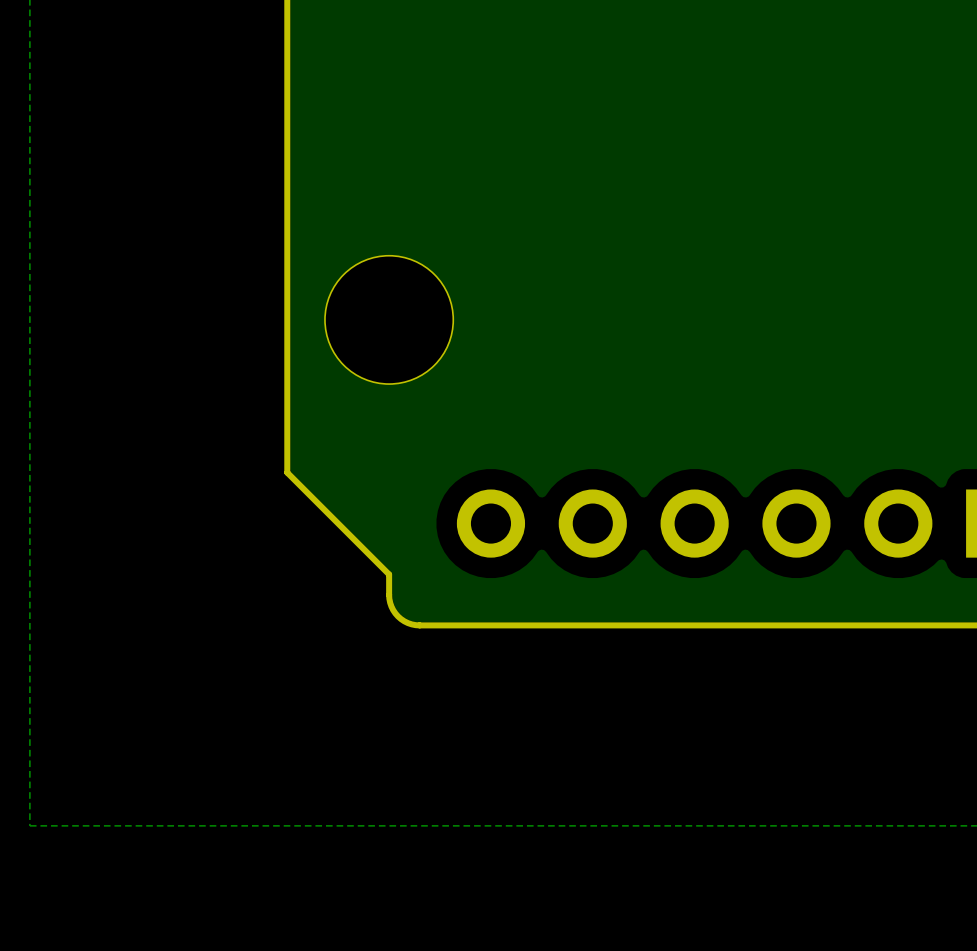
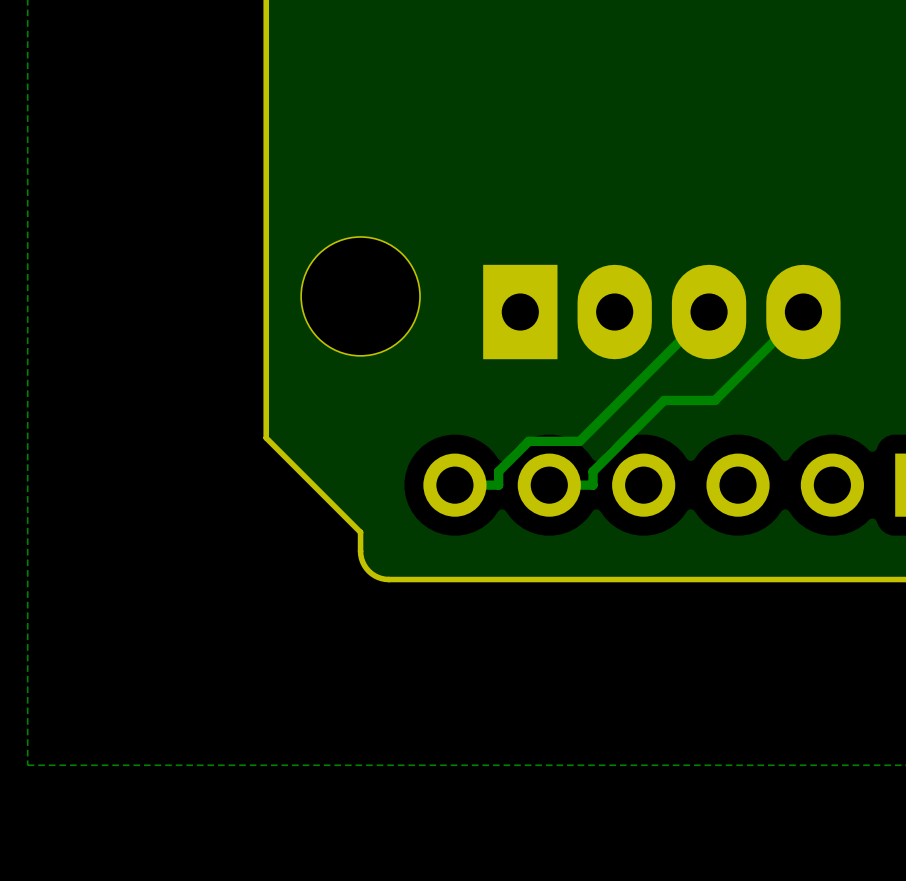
part: none -> (661, 312)
track: none -> (709, 312) (579, 441) (528, 441) (498, 471) (498, 485) (454, 485)
track: none -> (803, 312) (714, 400) (664, 400) (593, 471) (593, 485) (549, 485)

